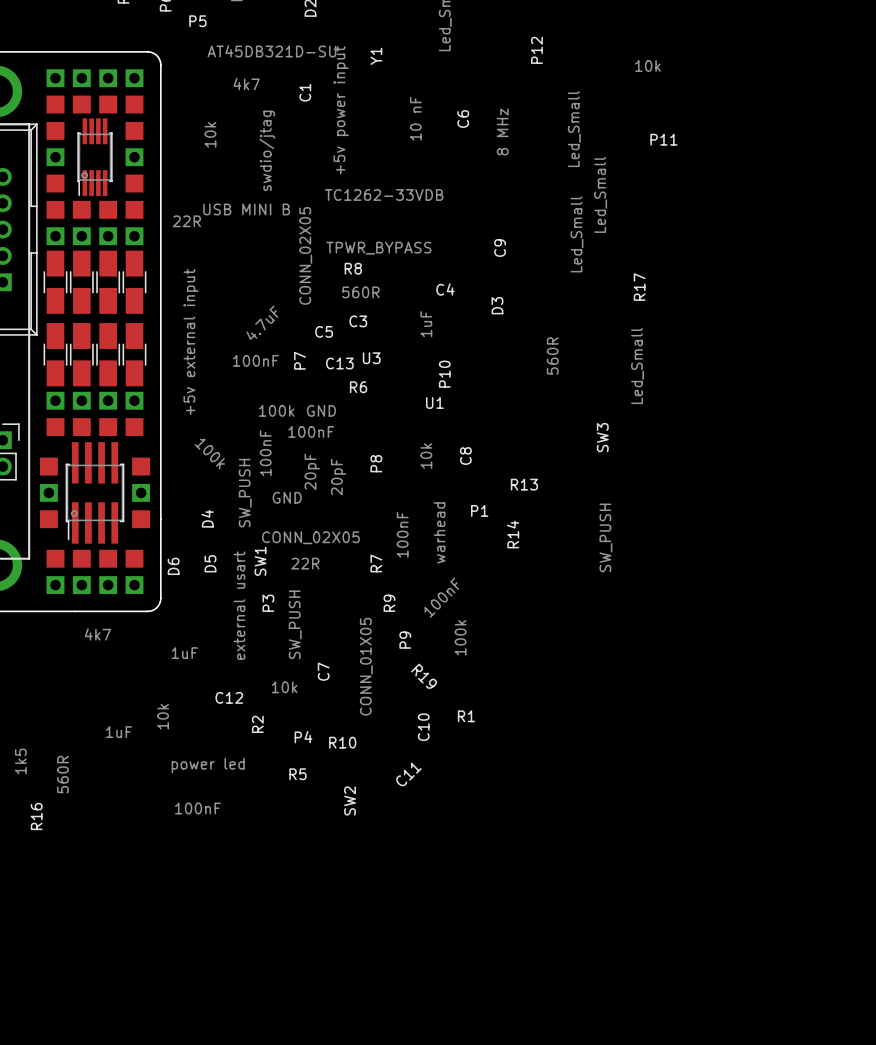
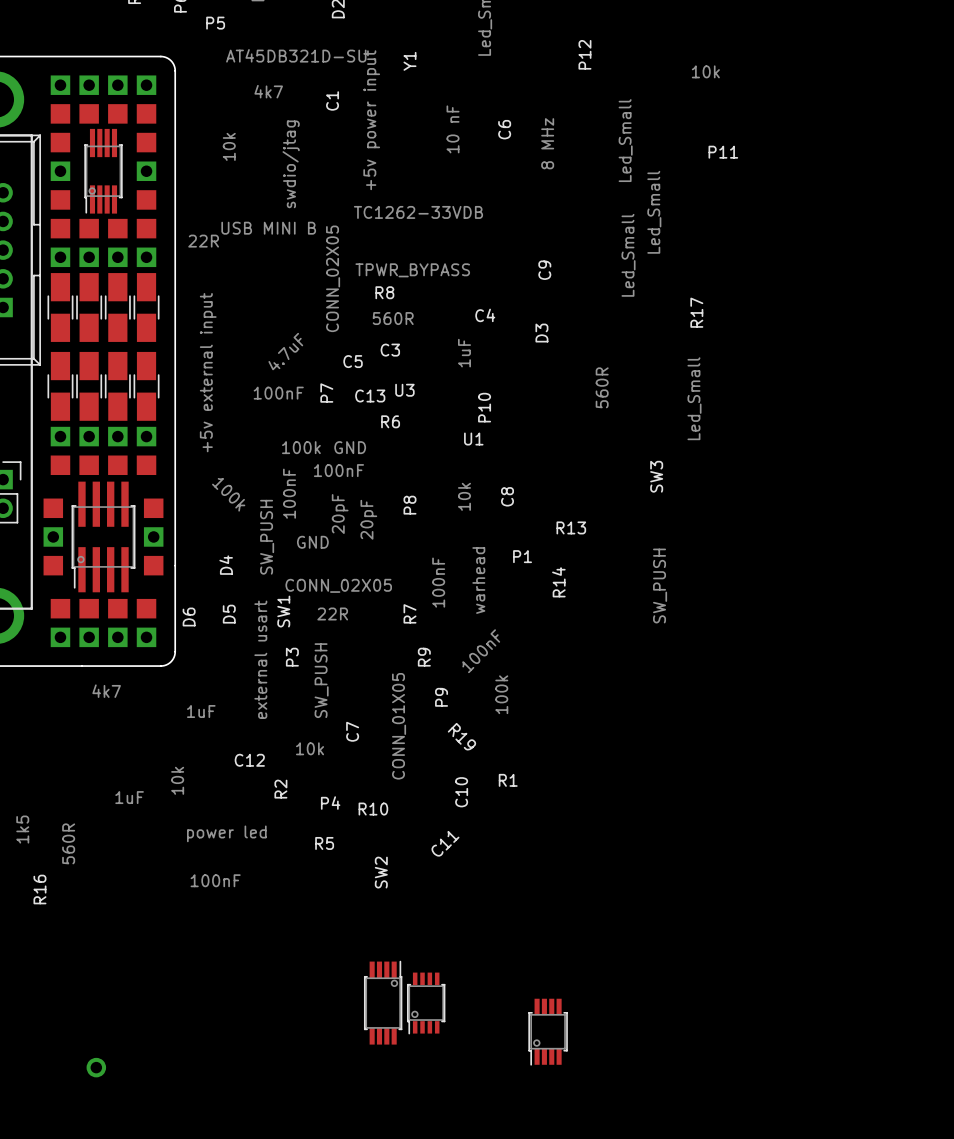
part: none -> (383, 1002)
part: none -> (426, 1003)
part: none -> (548, 1032)
part: none -> (96, 1067)

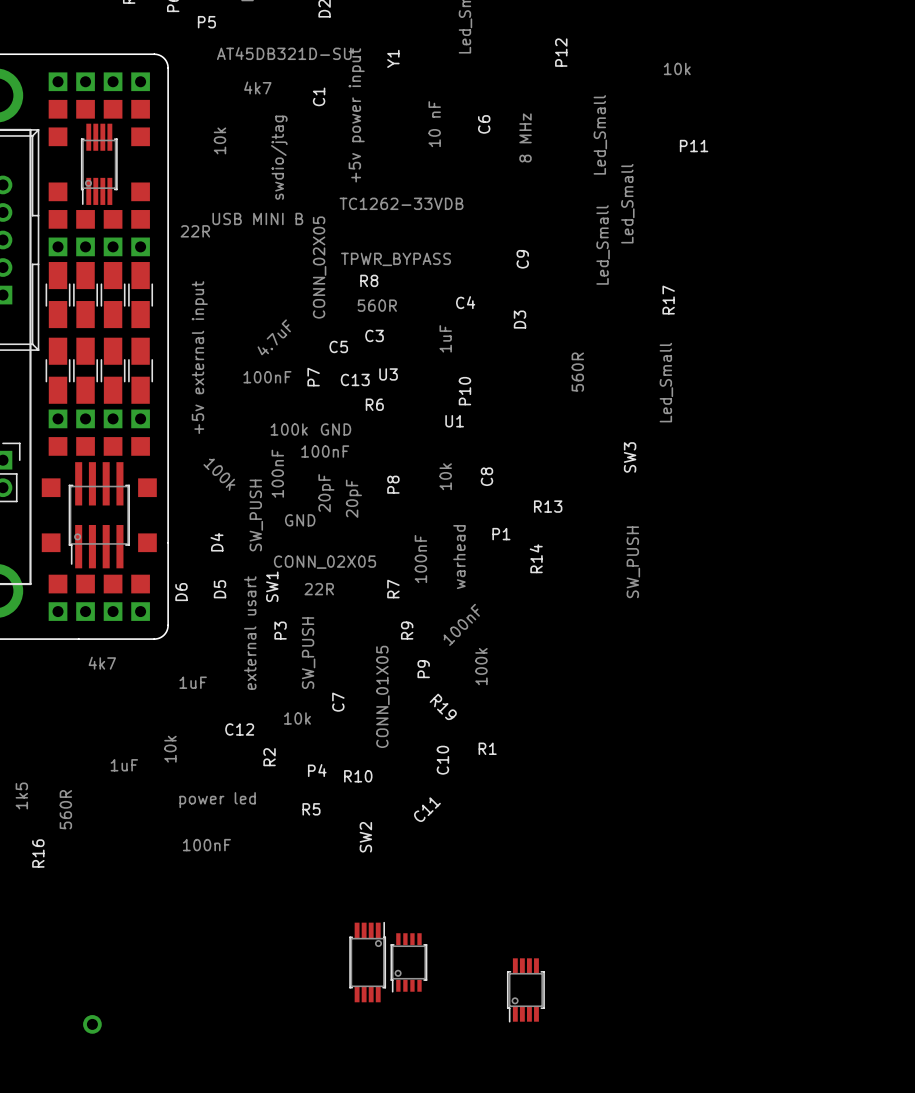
part: (60, 171) -> none
part: (146, 171) -> none
part: (53, 536) -> none
part: (153, 536) -> none

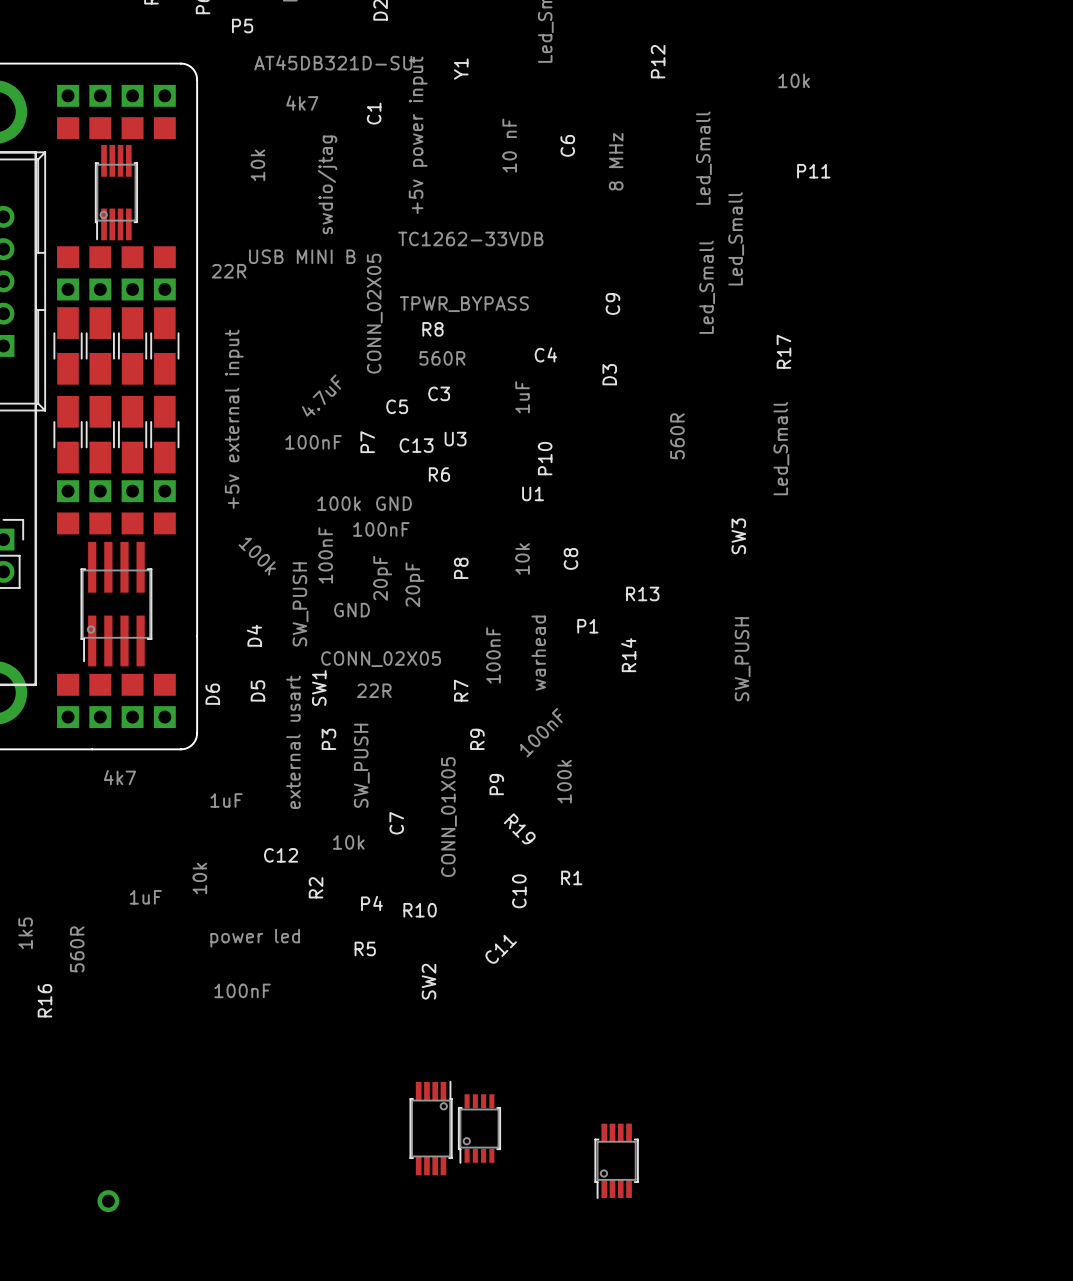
part: (58, 136) -> none
part: (140, 136) -> none
part: (58, 191) -> none
part: (140, 191) -> none
part: (51, 487) -> none
part: (147, 487) -> none
part: (51, 542) -> none
part: (147, 542) -> none

